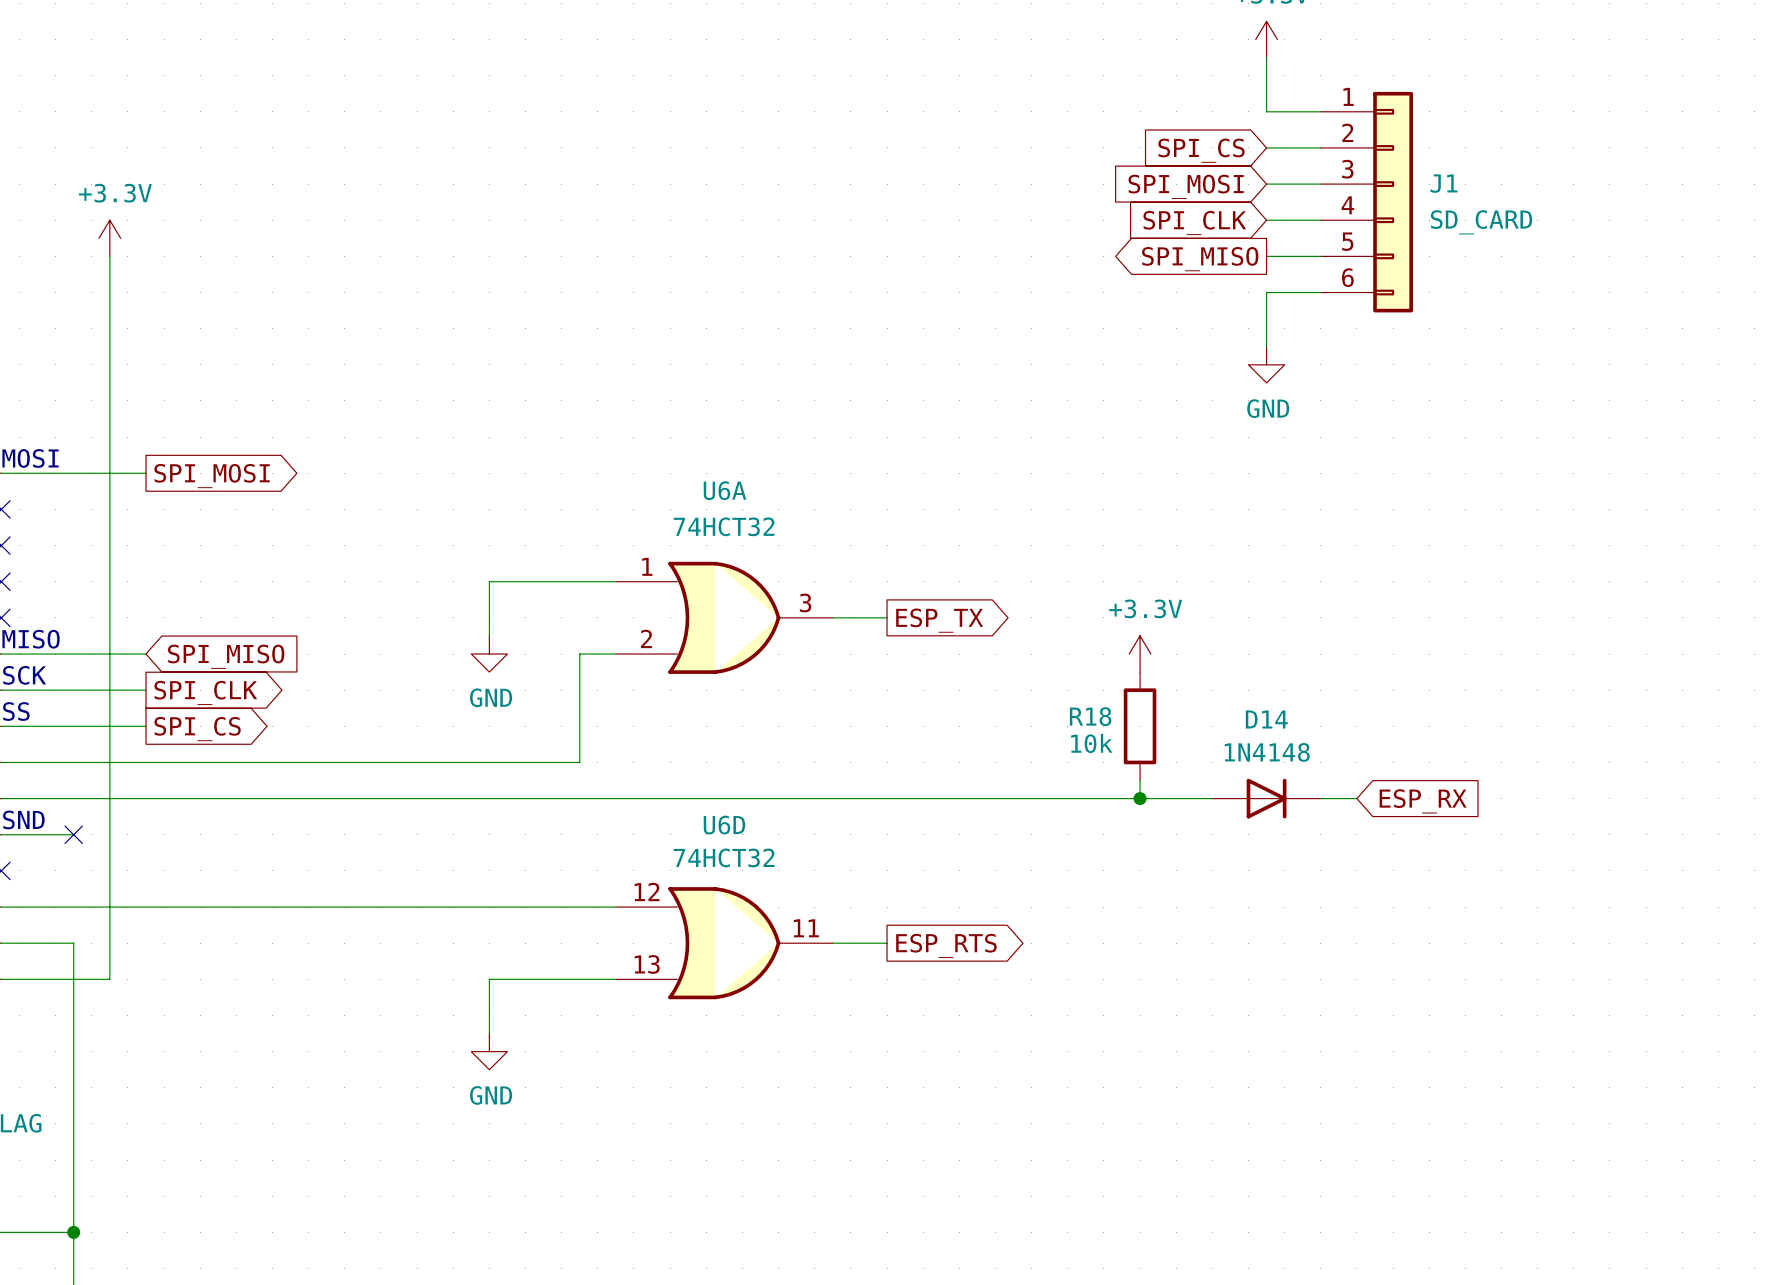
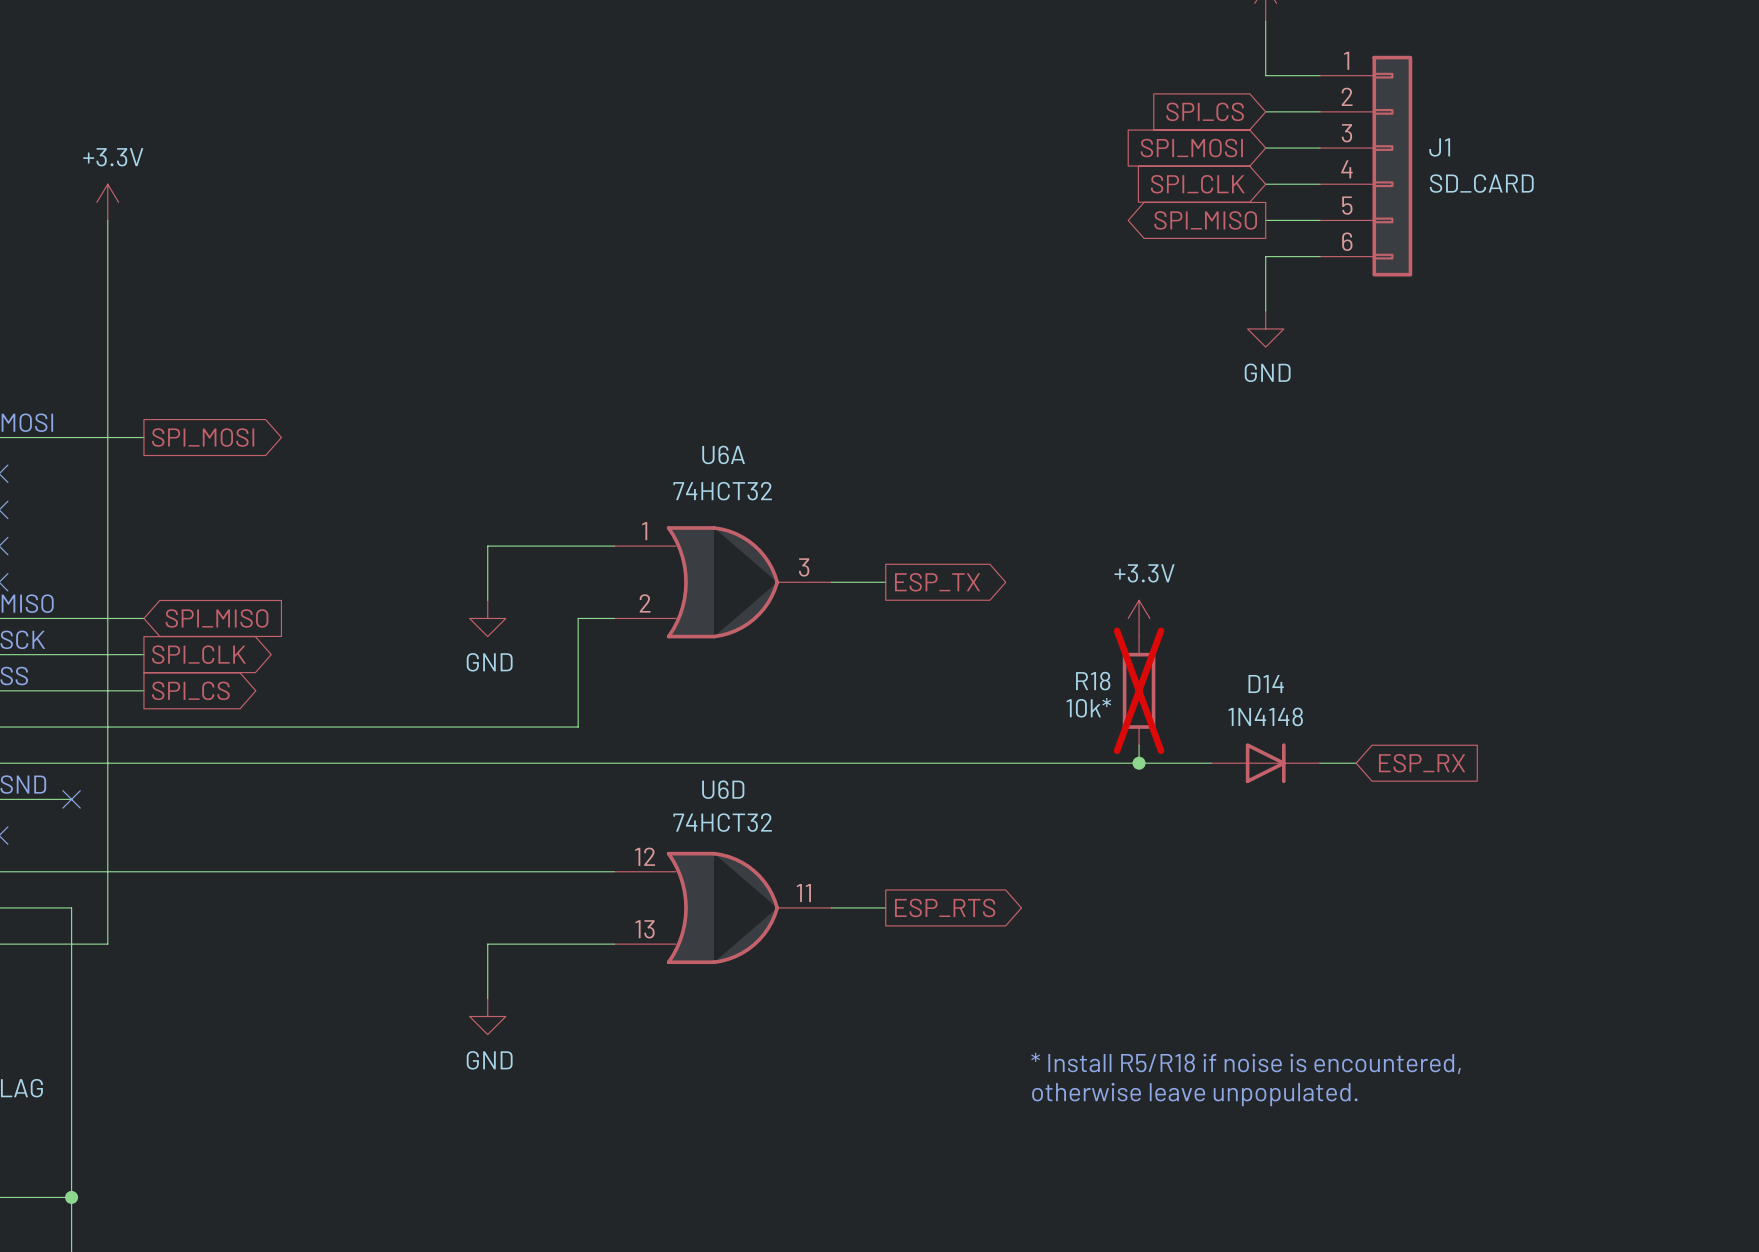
R18 do-not-place cross: none -> (1139, 690)
R18 value: 10k (1091, 743) -> 10k* (1088, 707)
text: none -> * Install R5/R18 if noise is encountered, (1246, 1063)
text: none -> otherwise leave unpopulated. (1194, 1094)

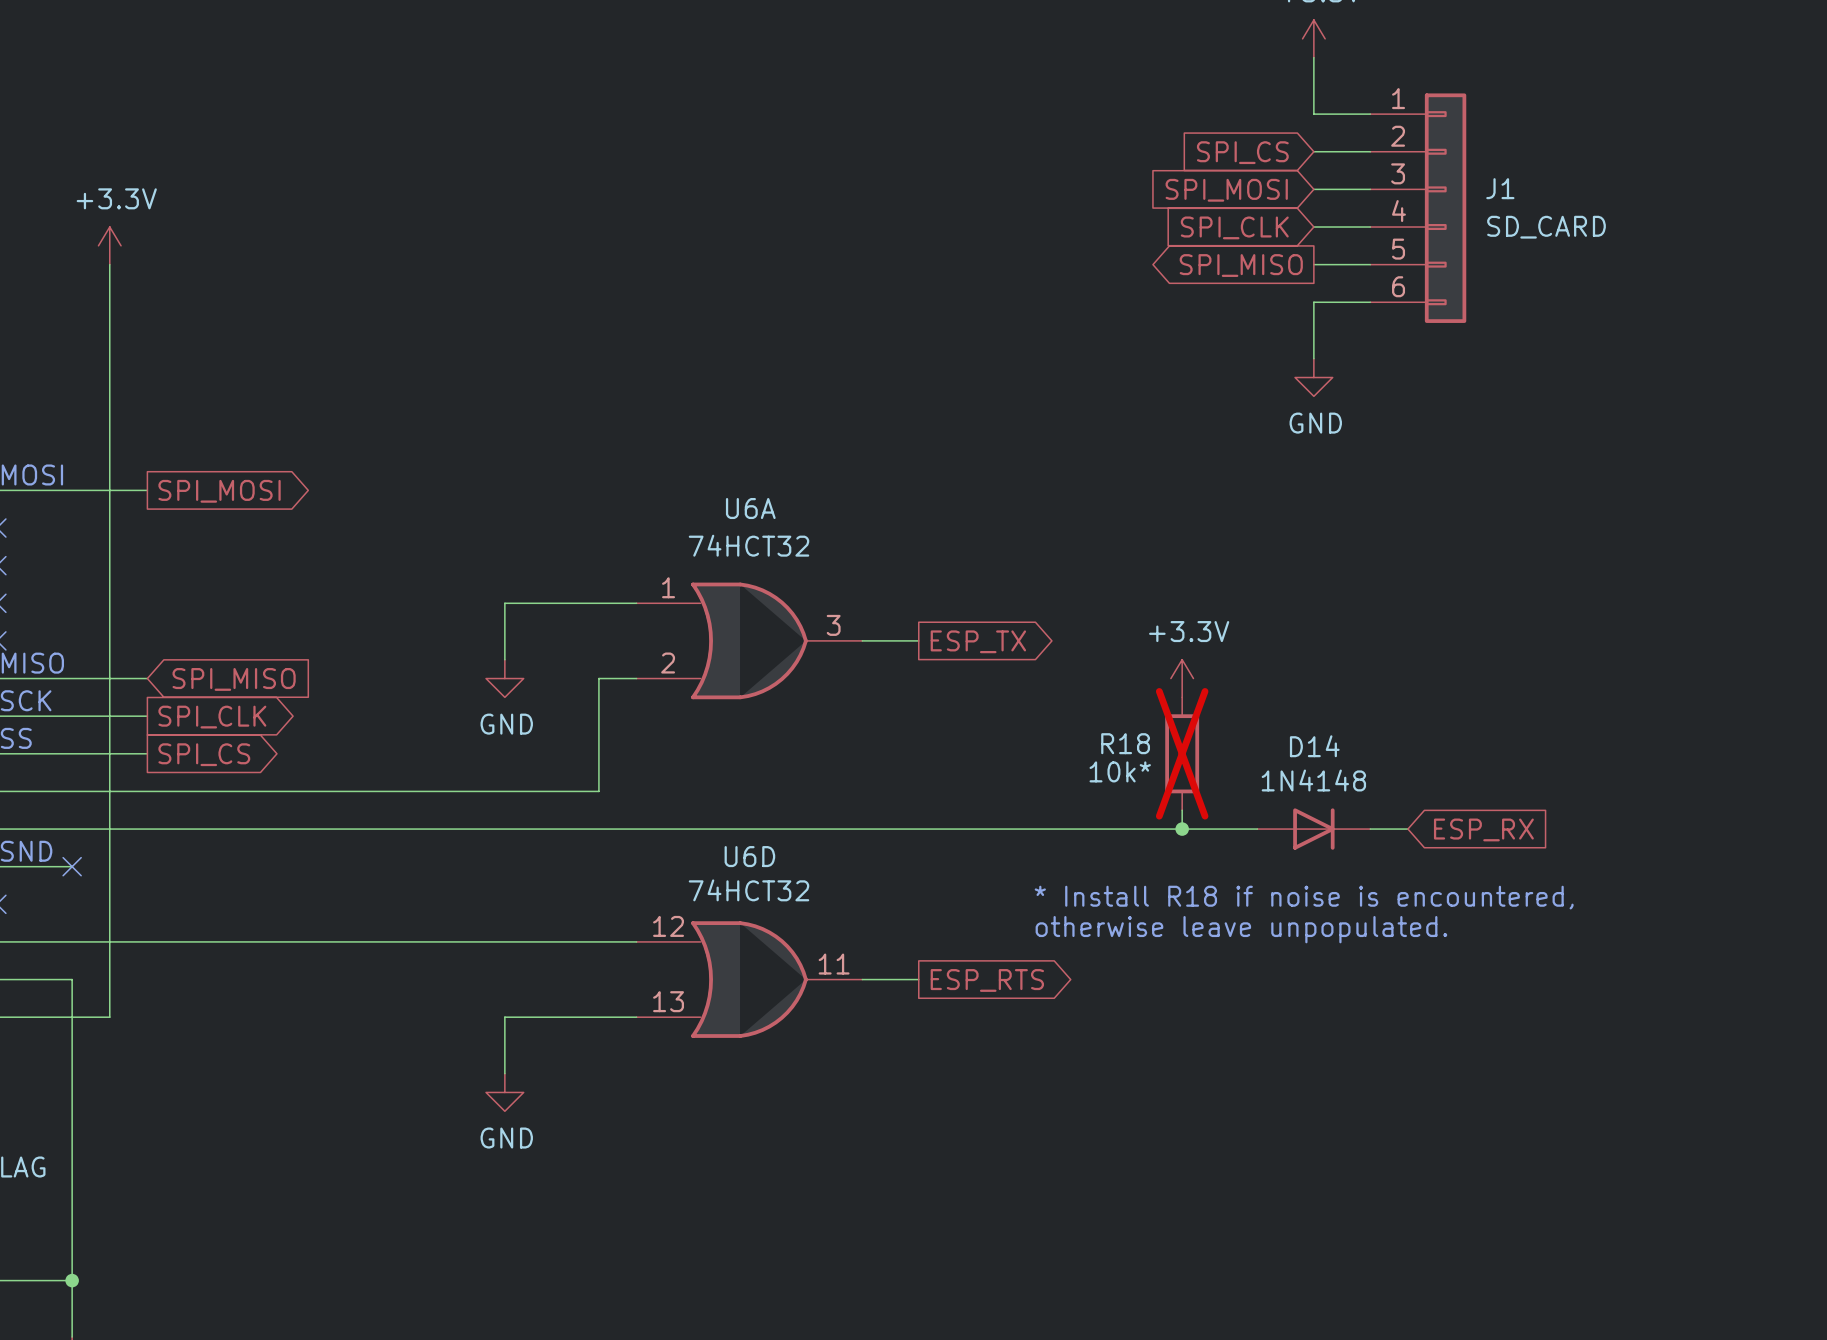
text: none -> * Install R18 if noise is encountered, (1304, 897)
text: * Install R5/R18 if noise is encountered, (1246, 1063) -> none
text position: otherwise leave unpopulated. (1194, 1094) -> otherwise leave unpopulated. (1241, 929)

